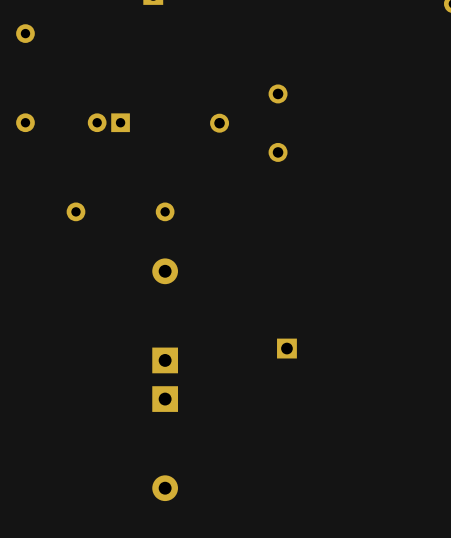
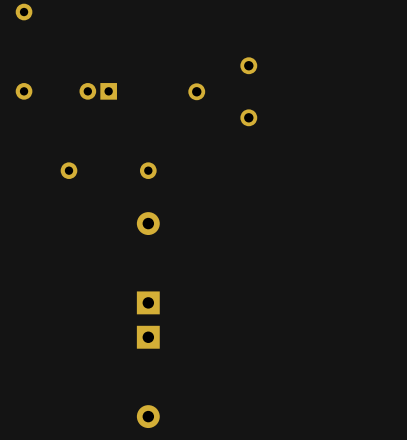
part: (286, 348) -> none

